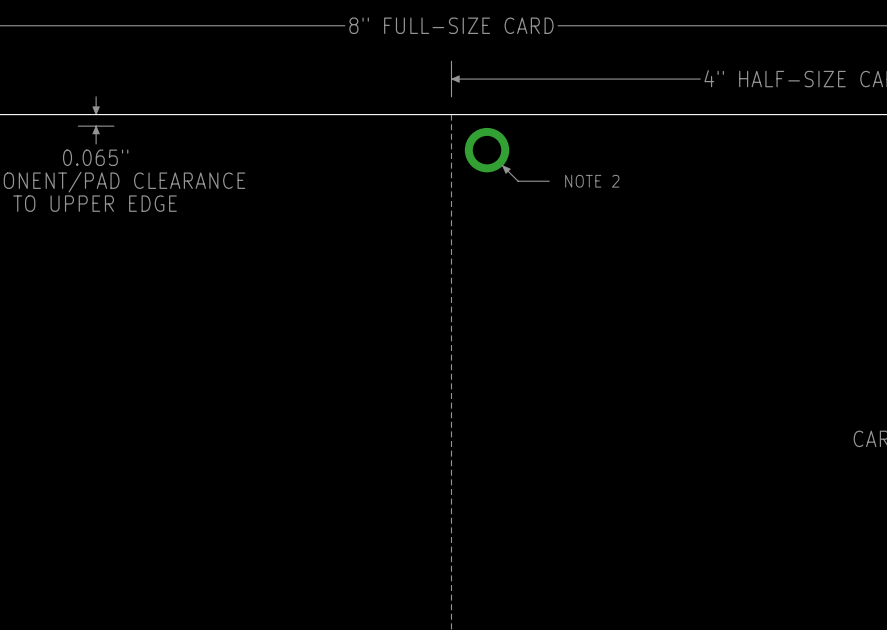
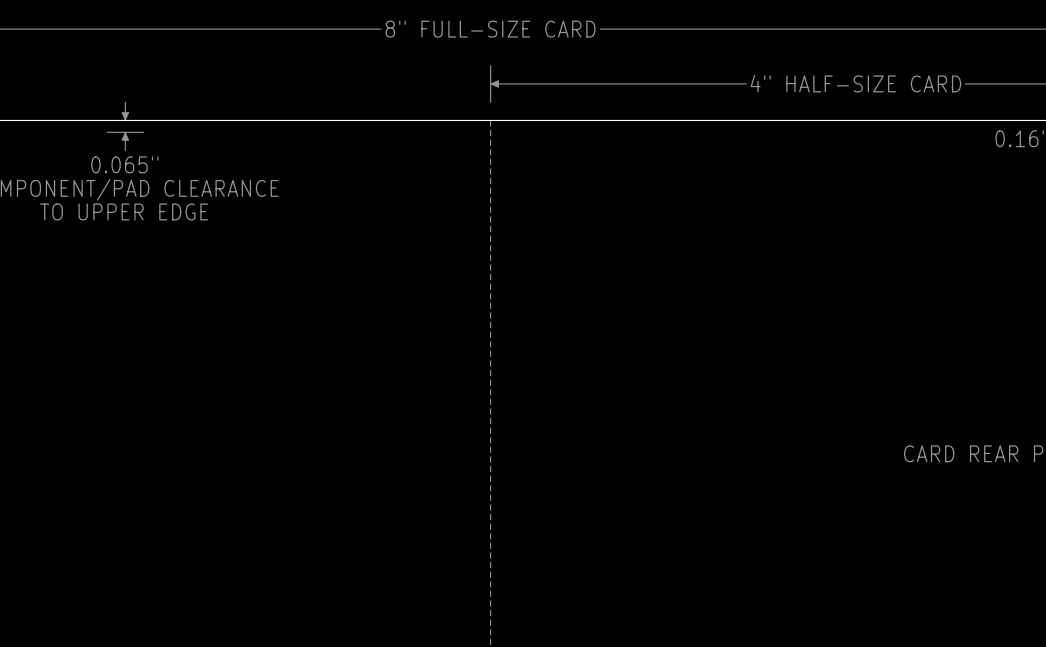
via: (487, 150) -> none
line: (502, 165) (518, 181) (549, 181) -> none
drawing: [502, 165, 511, 174] -> none
text: NOTE 2 (592, 181) -> none

